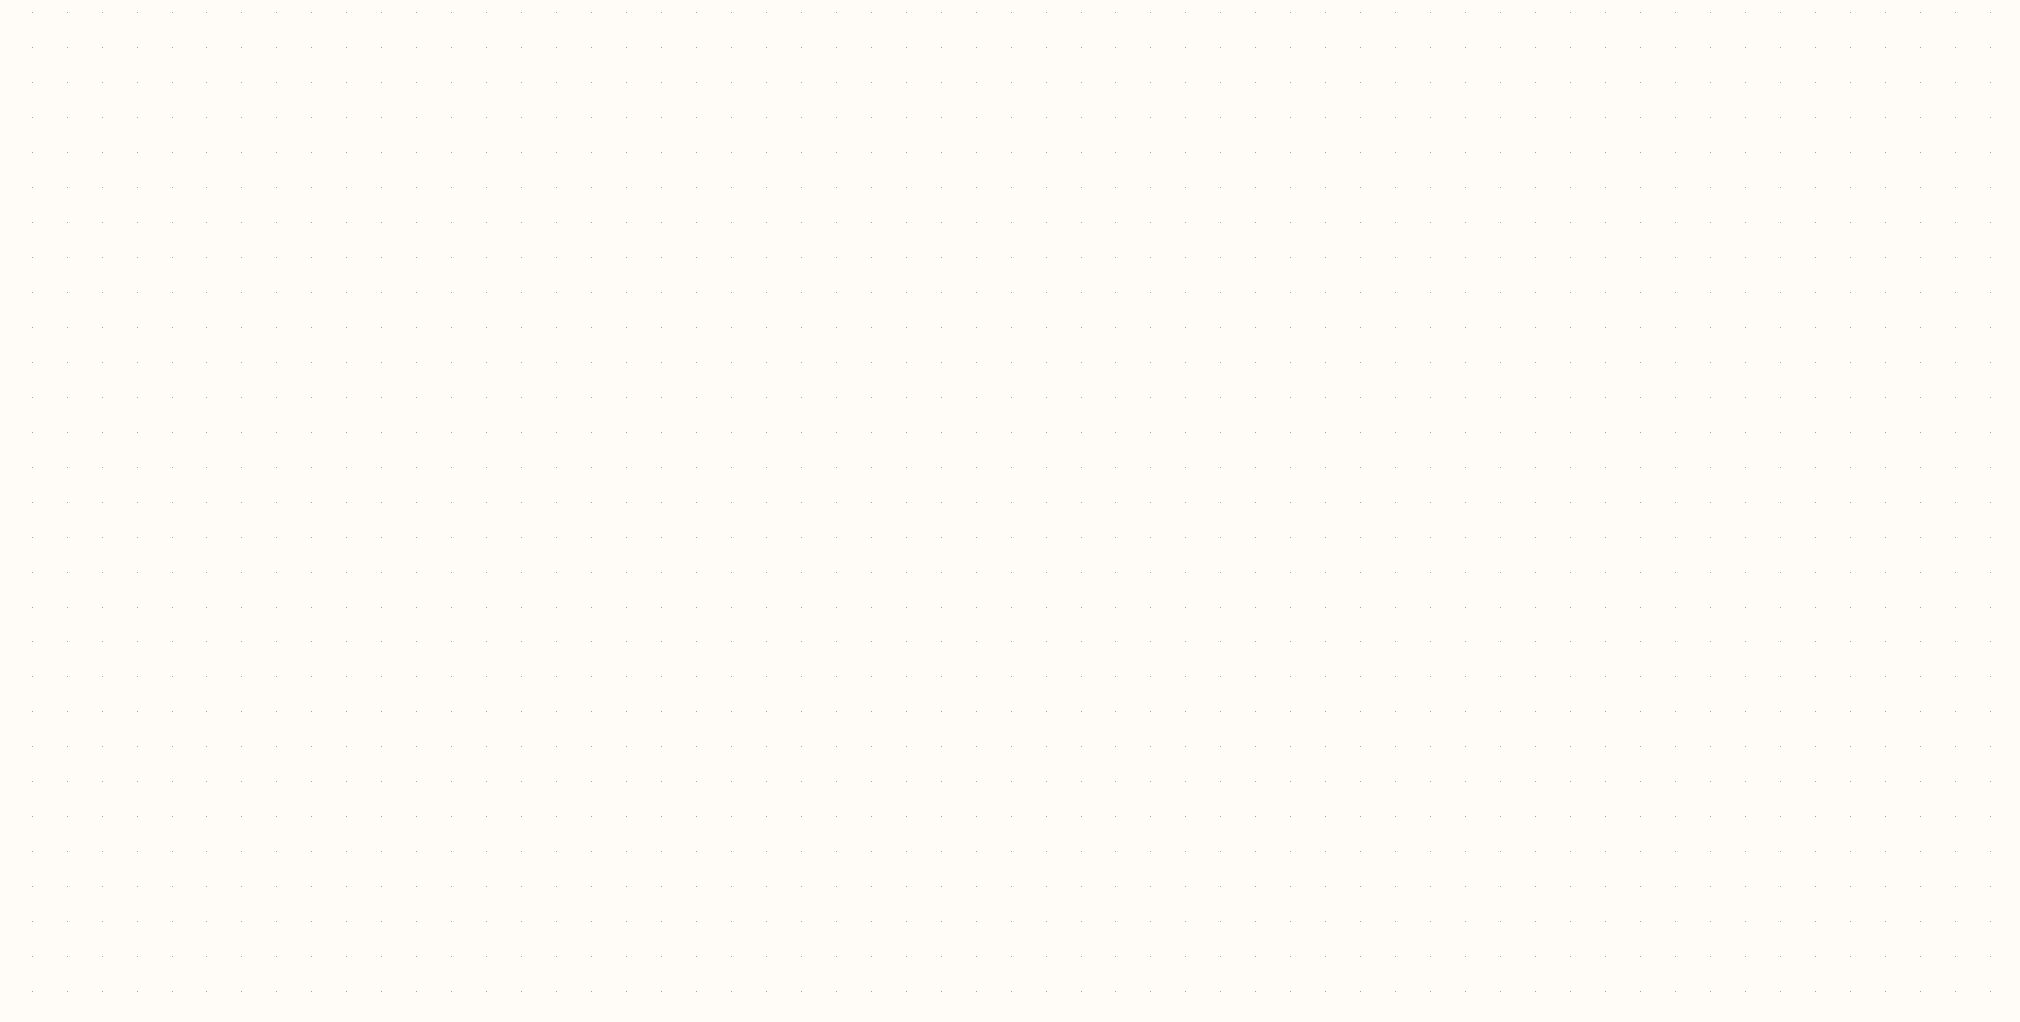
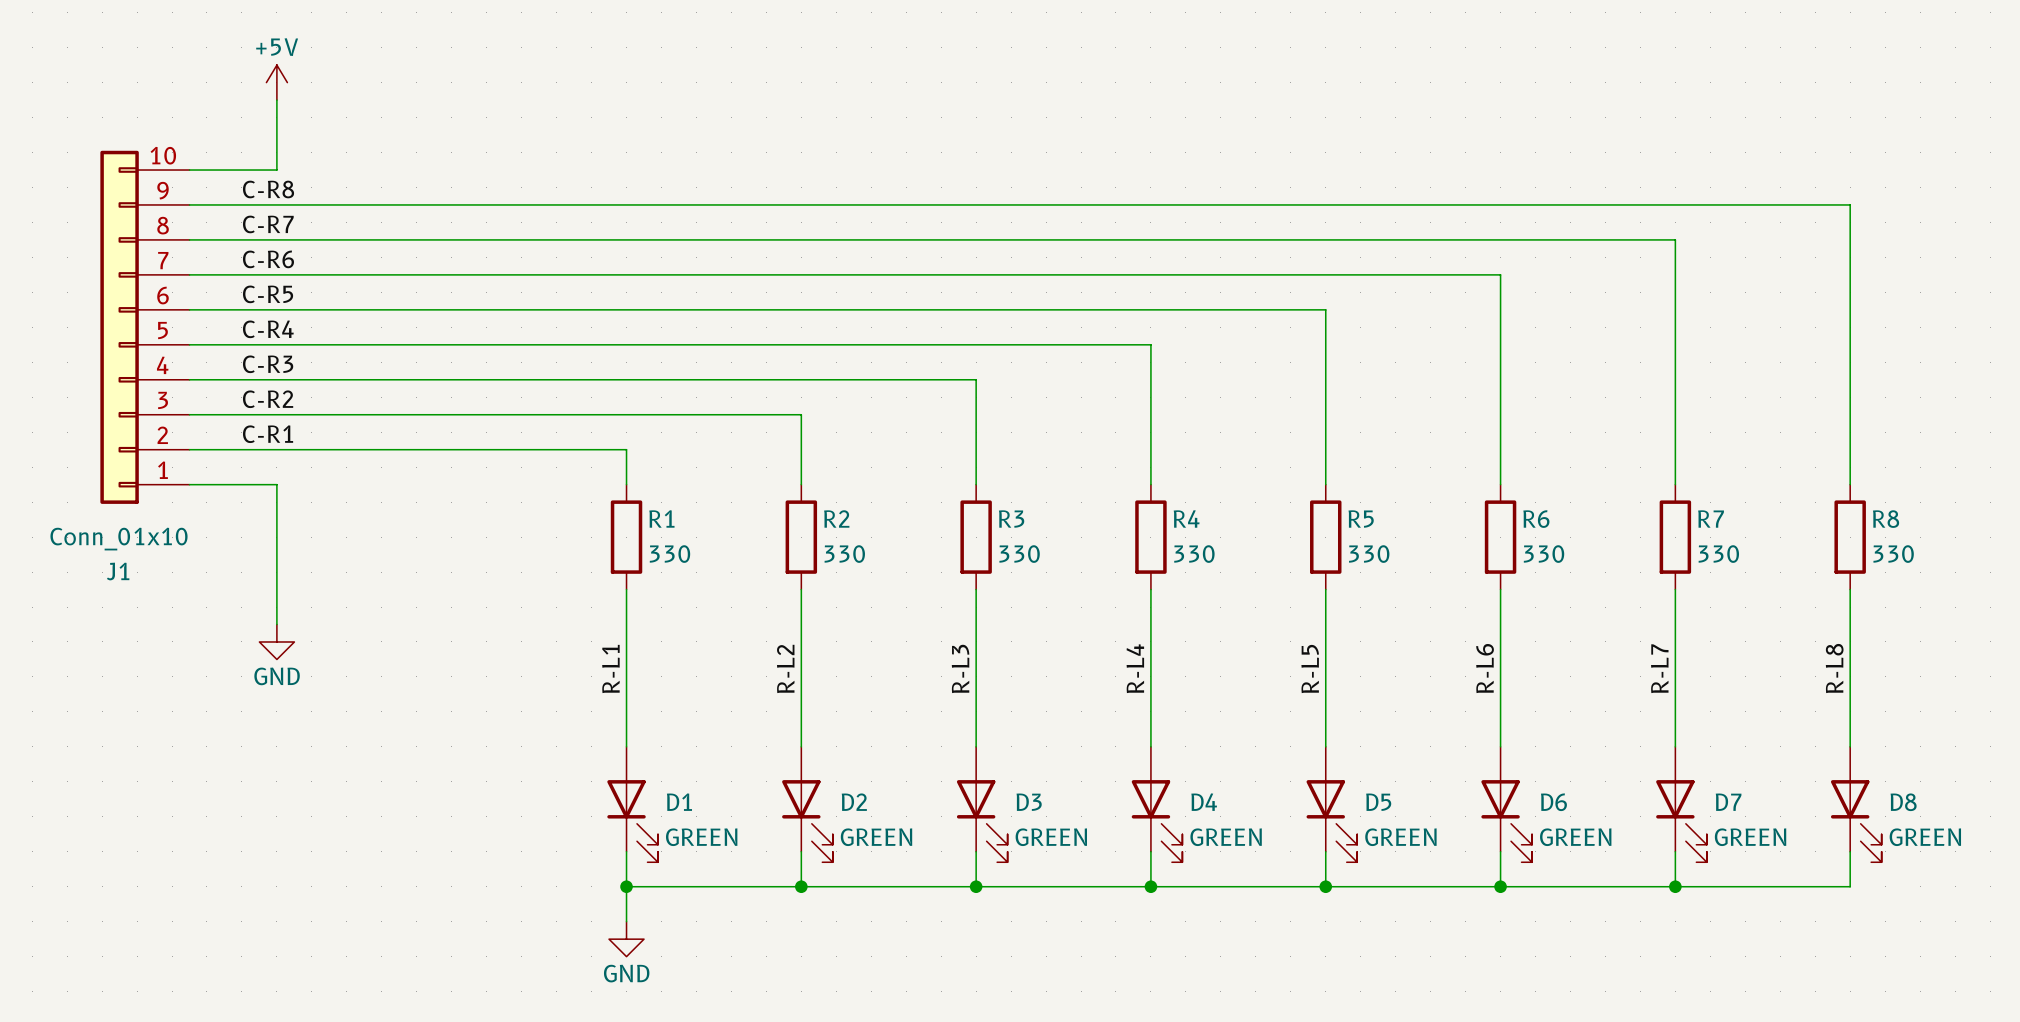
power symbol: none -> +5V (276, 82)
wire: none -> (276, 100) (276, 170) (189, 170)
label: none -> C-R8 (268, 189)
wire: none -> (189, 204) (1850, 204) (1850, 484)
label: none -> C-R7 (268, 224)
wire: none -> (189, 239) (1675, 239) (1675, 484)
label: none -> C-R6 (268, 259)
wire: none -> (189, 274) (1500, 274) (1500, 484)
label: none -> C-R5 (268, 294)
wire: none -> (189, 309) (1325, 309) (1325, 484)
J1: none -> Conn_01x10 (144, 327)
label: none -> C-R4 (268, 329)
wire: none -> (189, 344) (1150, 344) (1150, 484)
label: none -> C-R3 (268, 364)
wire: none -> (189, 379) (976, 379) (976, 484)
label: none -> C-R2 (268, 399)
wire: none -> (189, 414) (801, 414) (801, 484)
label: none -> C-R1 (268, 434)
wire: none -> (189, 449) (626, 449) (626, 484)
wire: none -> (189, 484) (276, 484) (276, 624)
R1: none -> 330 (626, 537)
R2: none -> 330 (801, 537)
R3: none -> 330 (976, 537)
R4: none -> 330 (1150, 537)
R5: none -> 330 (1325, 537)
R6: none -> 330 (1500, 537)
R7: none -> 330 (1675, 537)
R8: none -> 330 (1850, 537)
wire: none -> (626, 589) (626, 746)
wire: none -> (801, 589) (801, 746)
wire: none -> (976, 589) (976, 746)
wire: none -> (1150, 589) (1150, 746)
wire: none -> (1325, 589) (1325, 746)
wire: none -> (1500, 589) (1500, 746)
wire: none -> (1675, 589) (1675, 746)
wire: none -> (1850, 589) (1850, 746)
power symbol: none -> GND (276, 641)
label: none -> R-L1 (610, 668)
label: none -> R-L2 (785, 668)
label: none -> R-L3 (960, 668)
label: none -> R-L4 (1135, 668)
label: none -> R-L5 (1310, 668)
label: none -> R-L6 (1485, 668)
label: none -> R-L7 (1659, 668)
label: none -> R-L8 (1834, 668)
D1: none -> GREEN (632, 804)
D2: none -> GREEN (807, 804)
D3: none -> GREEN (982, 804)
D4: none -> GREEN (1157, 804)
D5: none -> GREEN (1331, 804)
D6: none -> GREEN (1506, 804)
D7: none -> GREEN (1681, 804)
D8: none -> GREEN (1856, 804)
wire: none -> (626, 851) (626, 921)
wire: none -> (801, 851) (801, 886)
wire: none -> (976, 851) (976, 886)
wire: none -> (1150, 851) (1150, 886)
wire: none -> (1325, 851) (1325, 886)
wire: none -> (1500, 851) (1500, 886)
wire: none -> (1675, 851) (1675, 886)
wire: none -> (1850, 851) (1850, 886) (626, 886)
junction: none -> (626, 886)
junction: none -> (801, 886)
junction: none -> (976, 886)
junction: none -> (1150, 886)
junction: none -> (1325, 886)
junction: none -> (1500, 886)
junction: none -> (1675, 886)
power symbol: none -> GND (626, 939)

